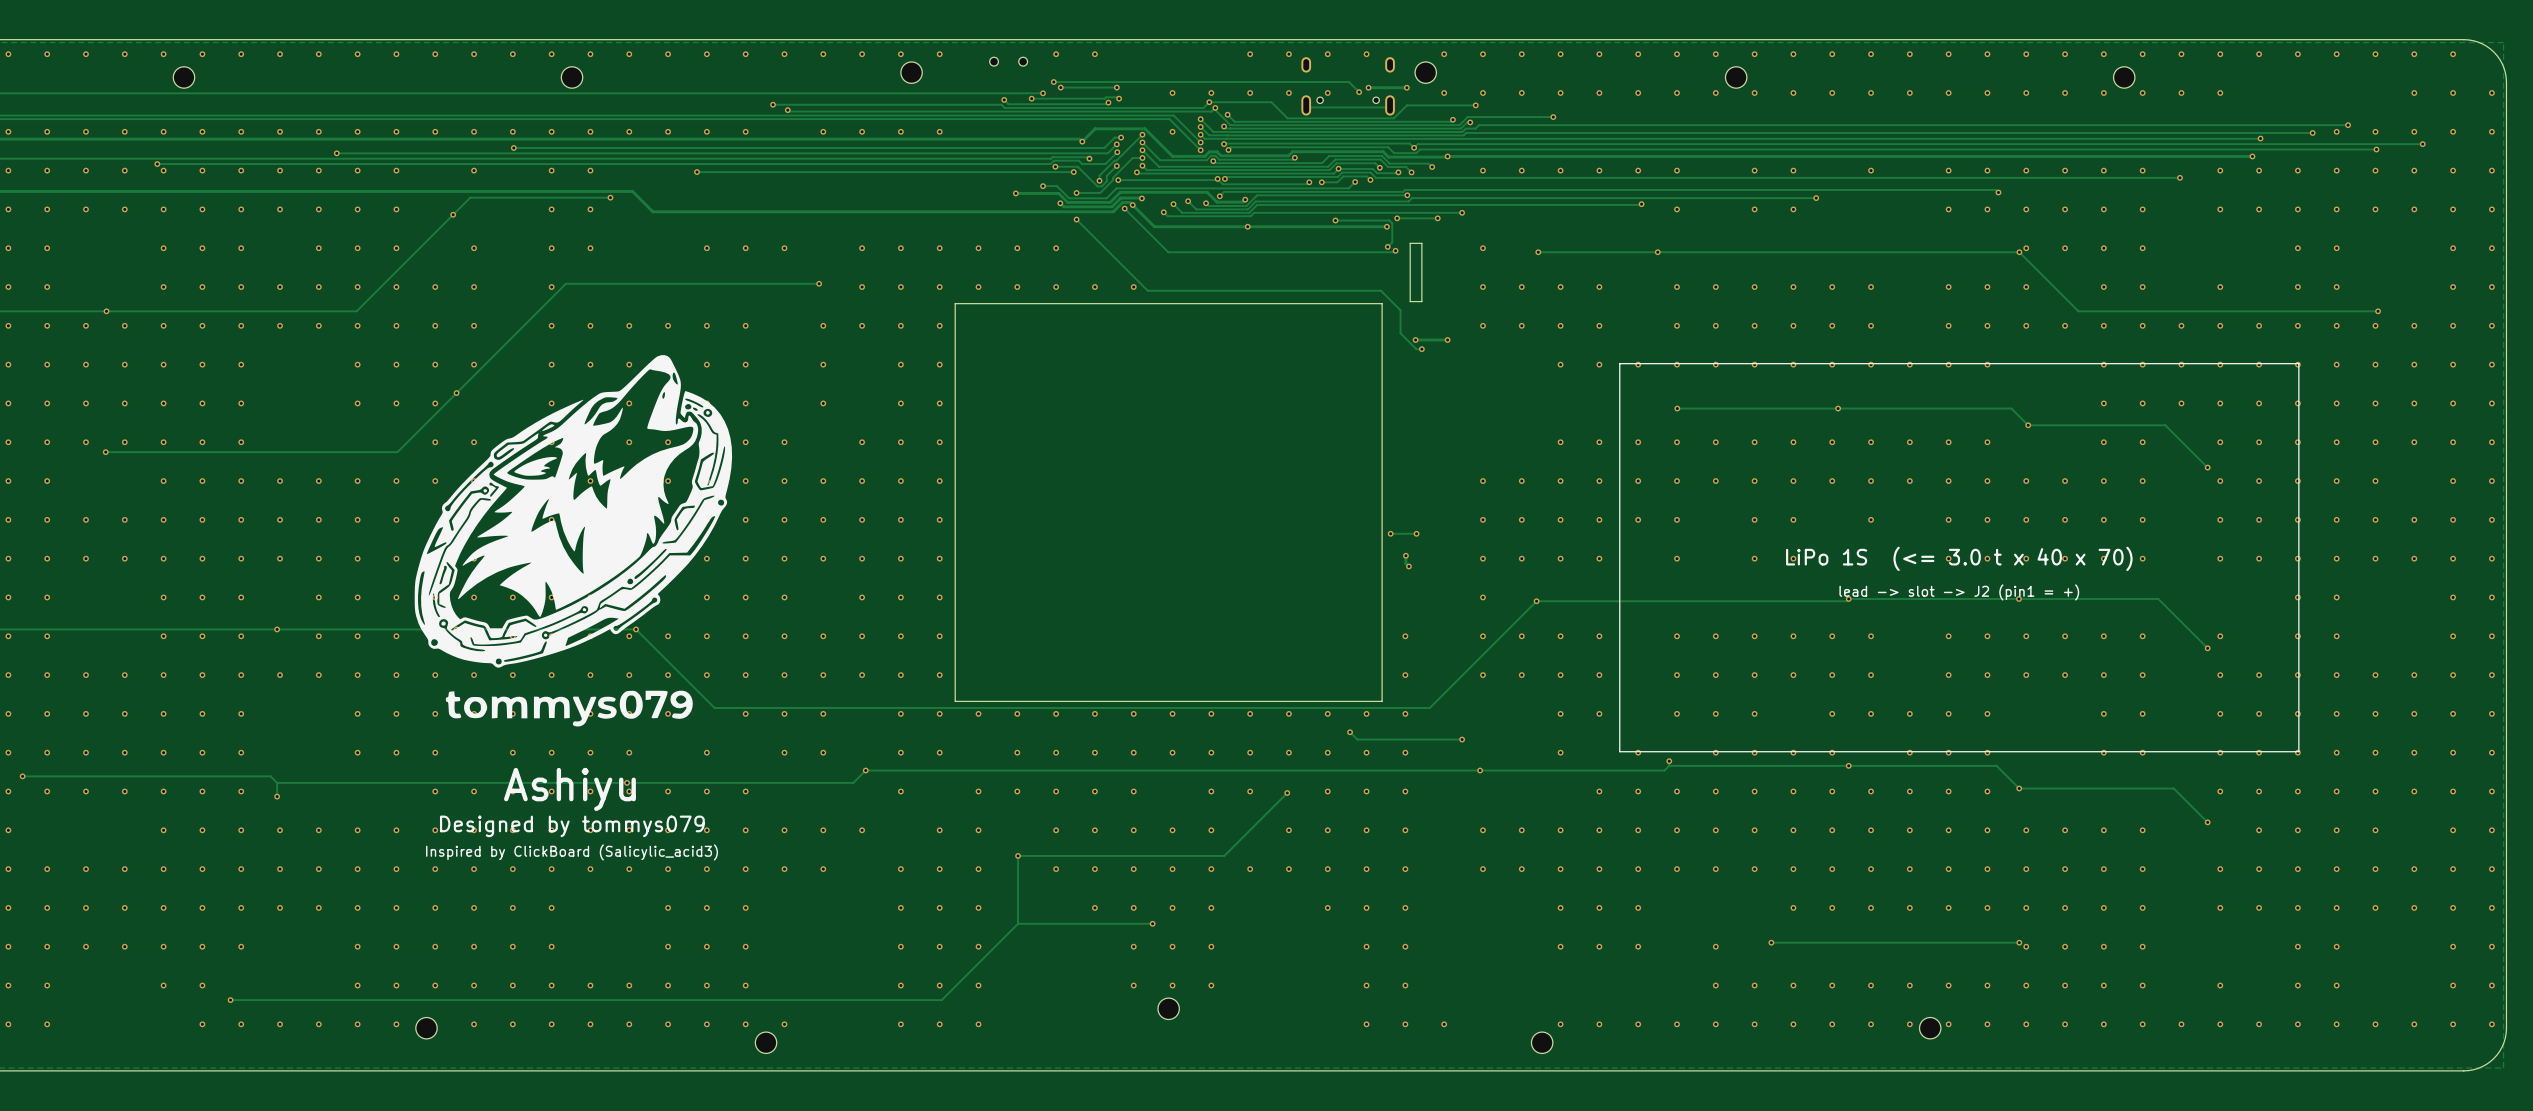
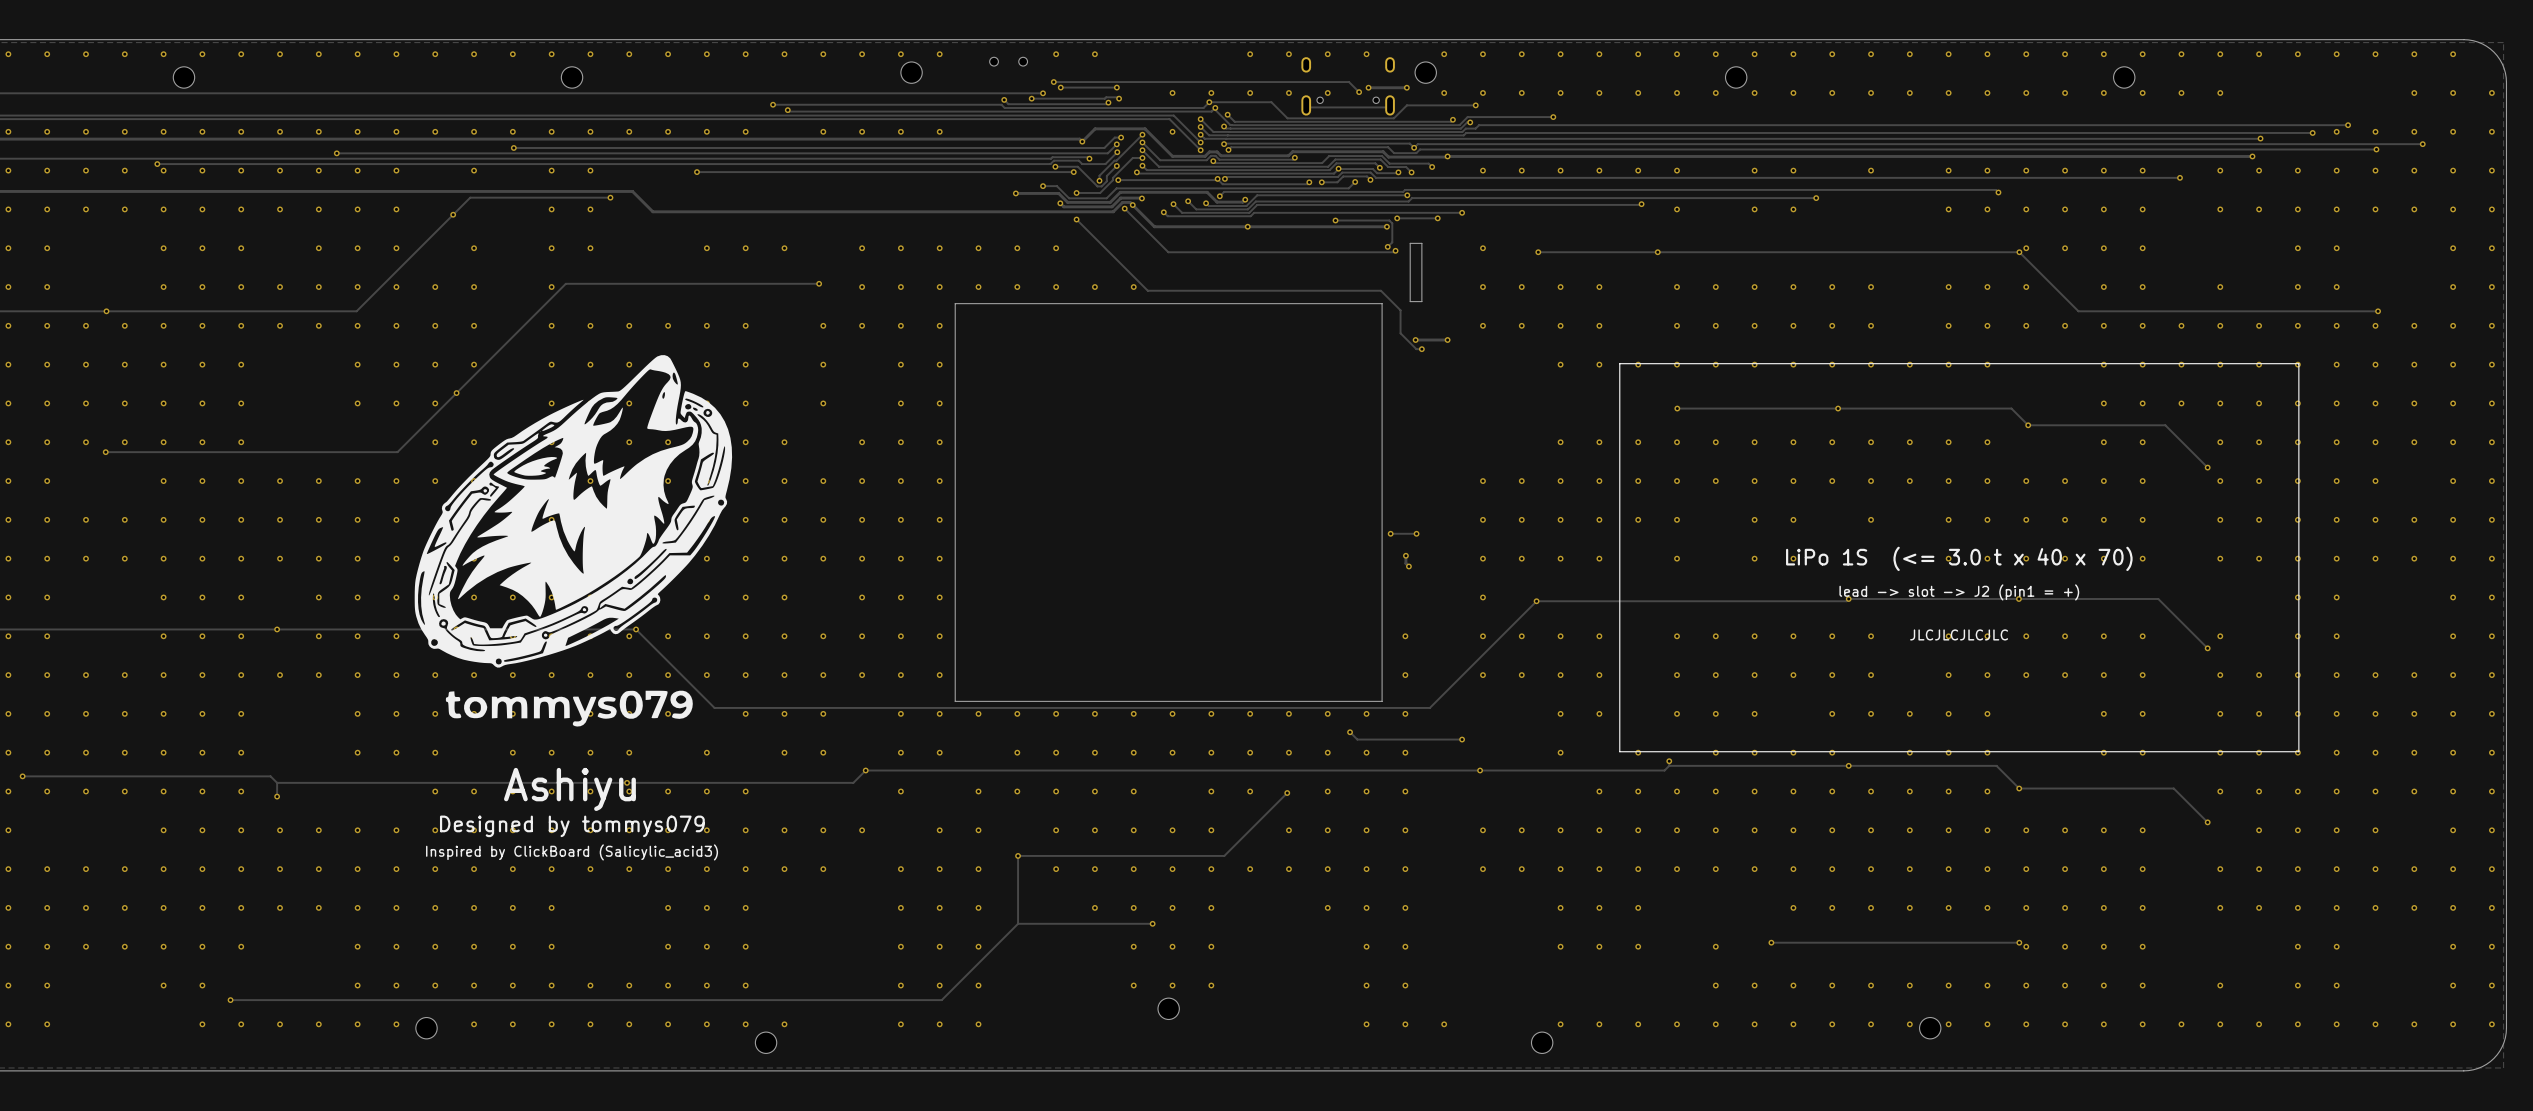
text: none -> JLCJLCJLCJLC (1959, 634)

